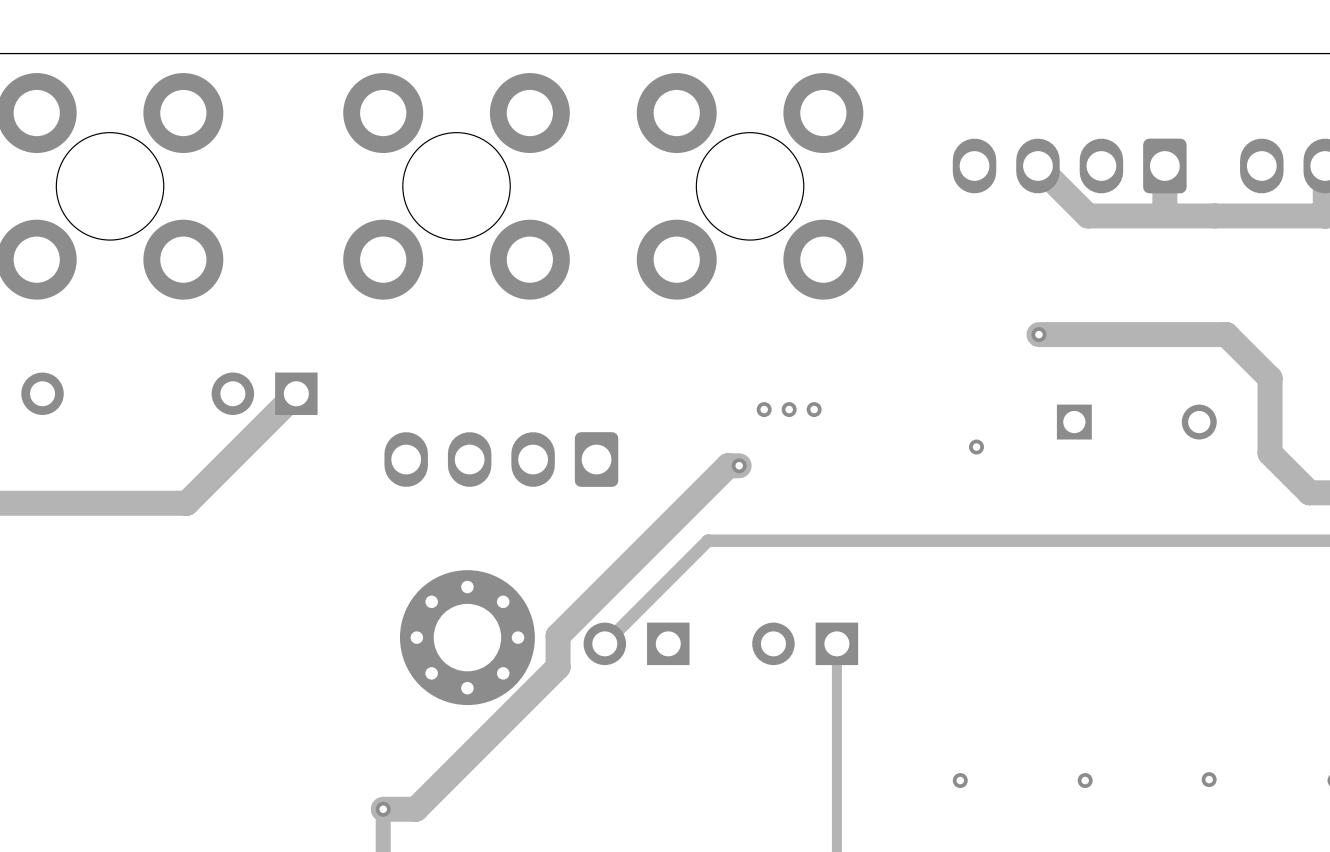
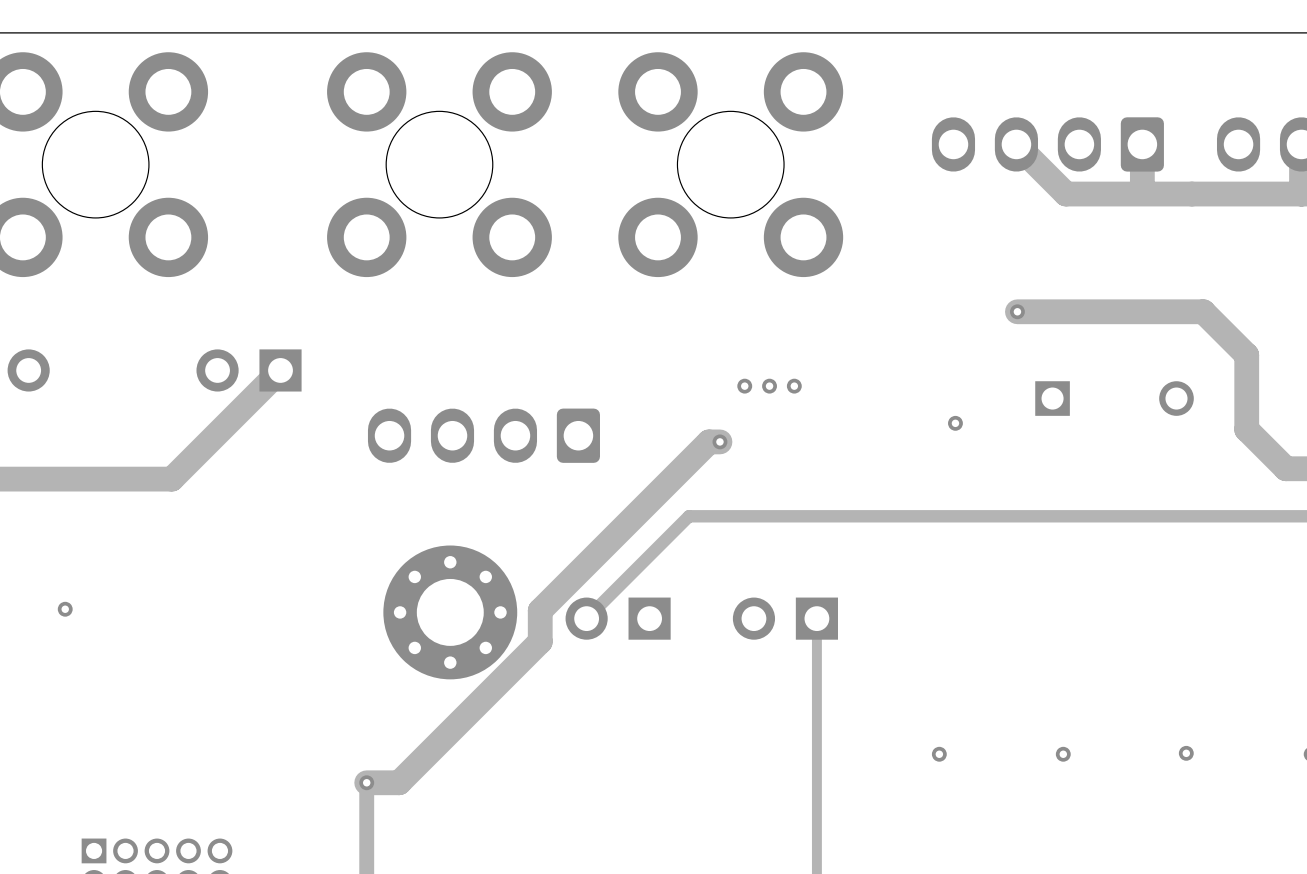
via: none -> (65, 609)

